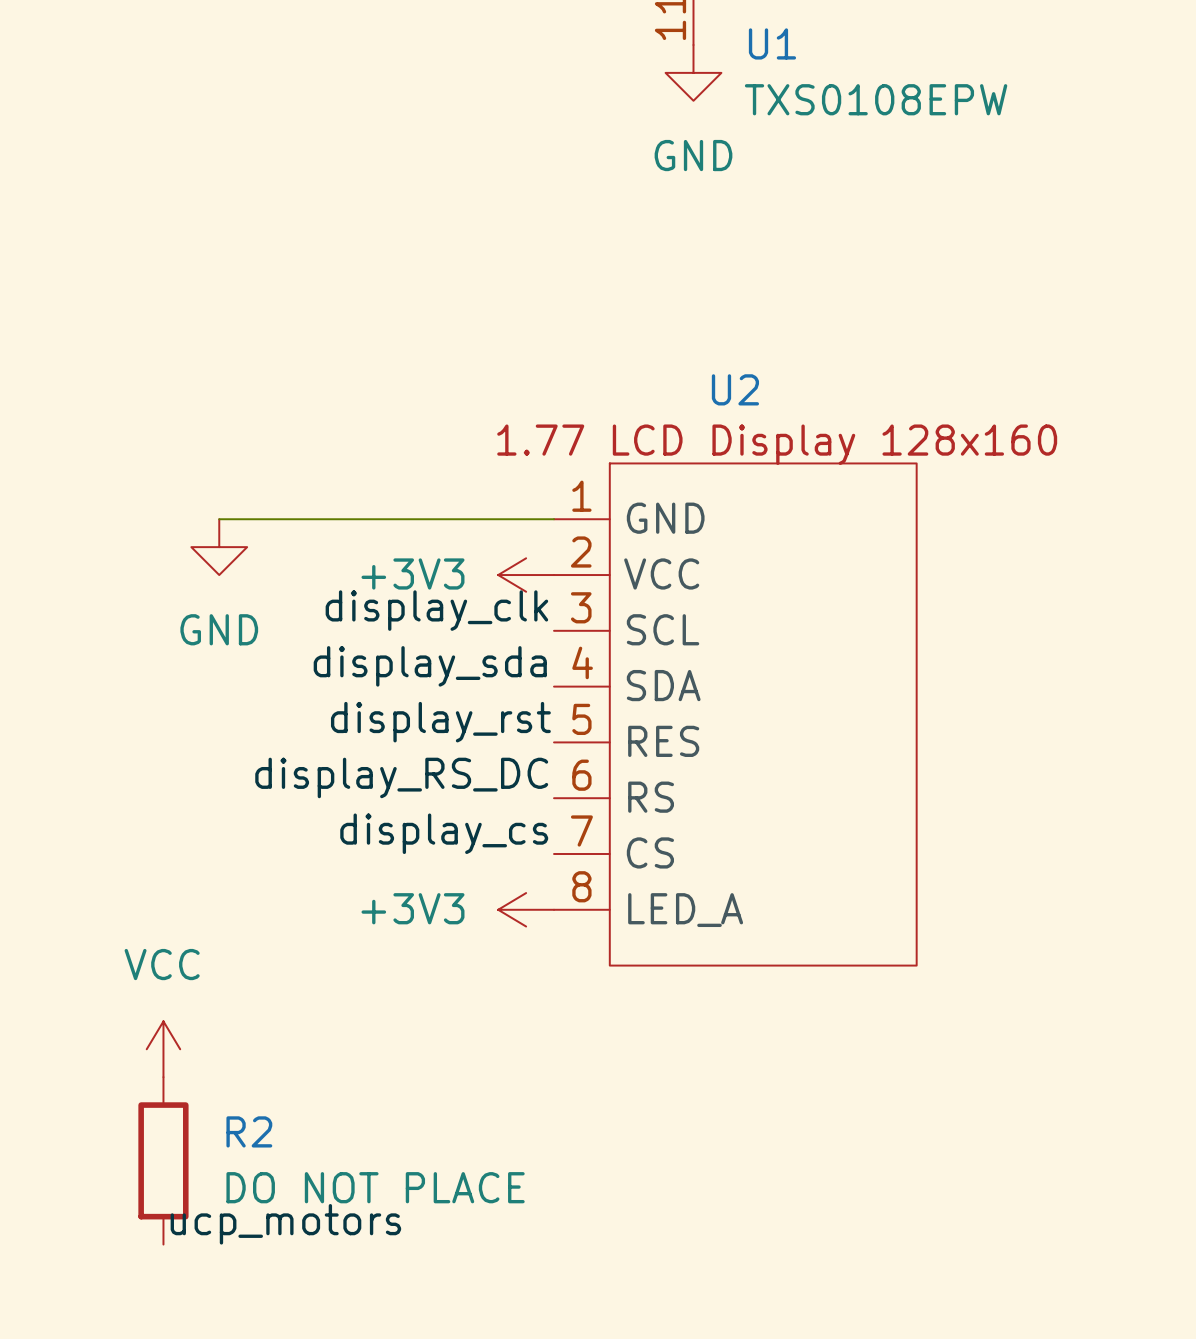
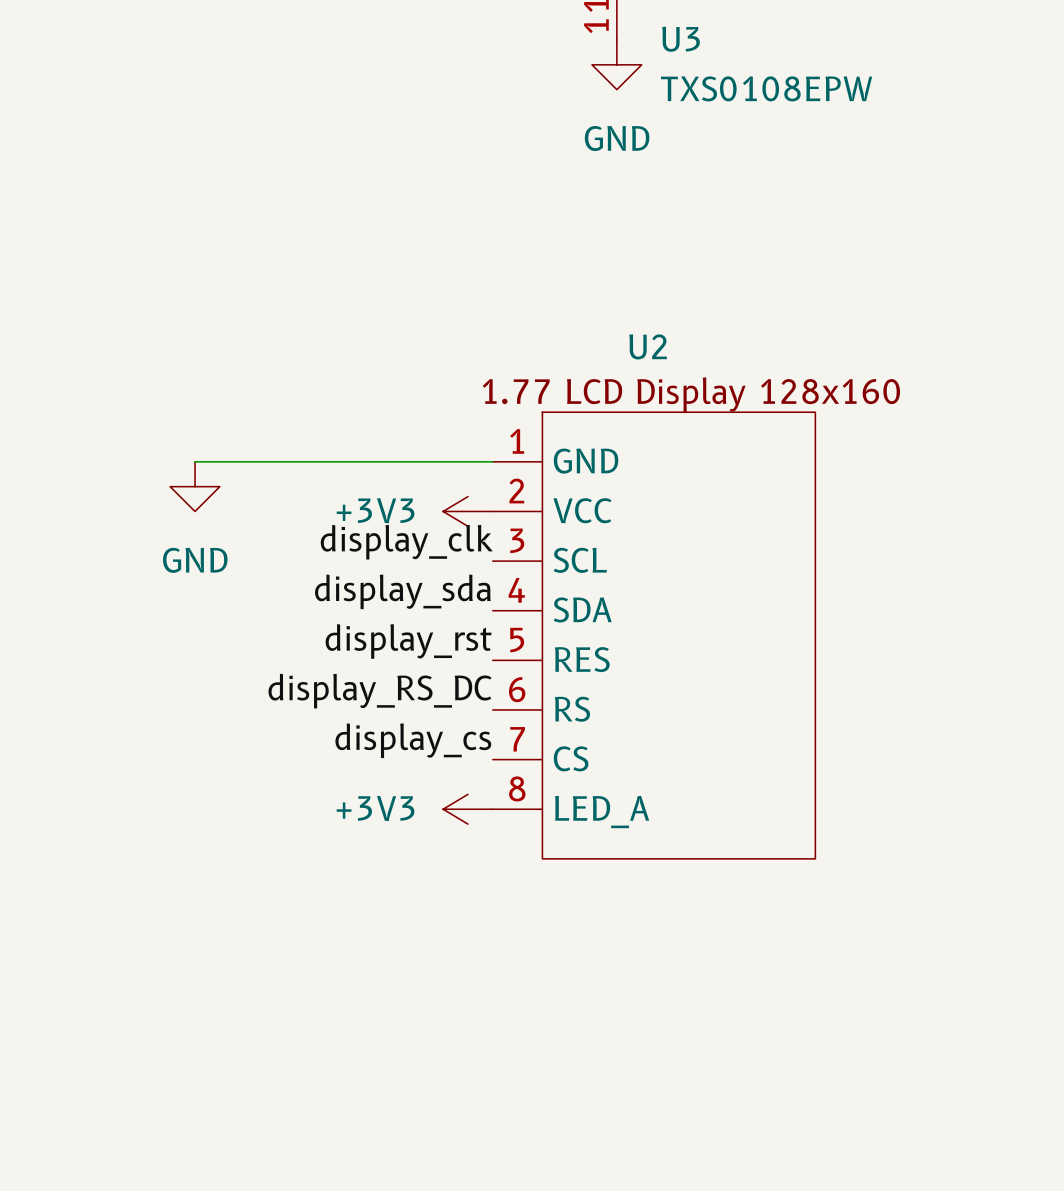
U1 name: U1 (772, 43) -> U3 (681, 39)
power symbol: VCC (163, 1049) -> none
R2: DO NOT PLACE (163, 1160) -> none
label: ucp_motors (285, 1224) -> none

